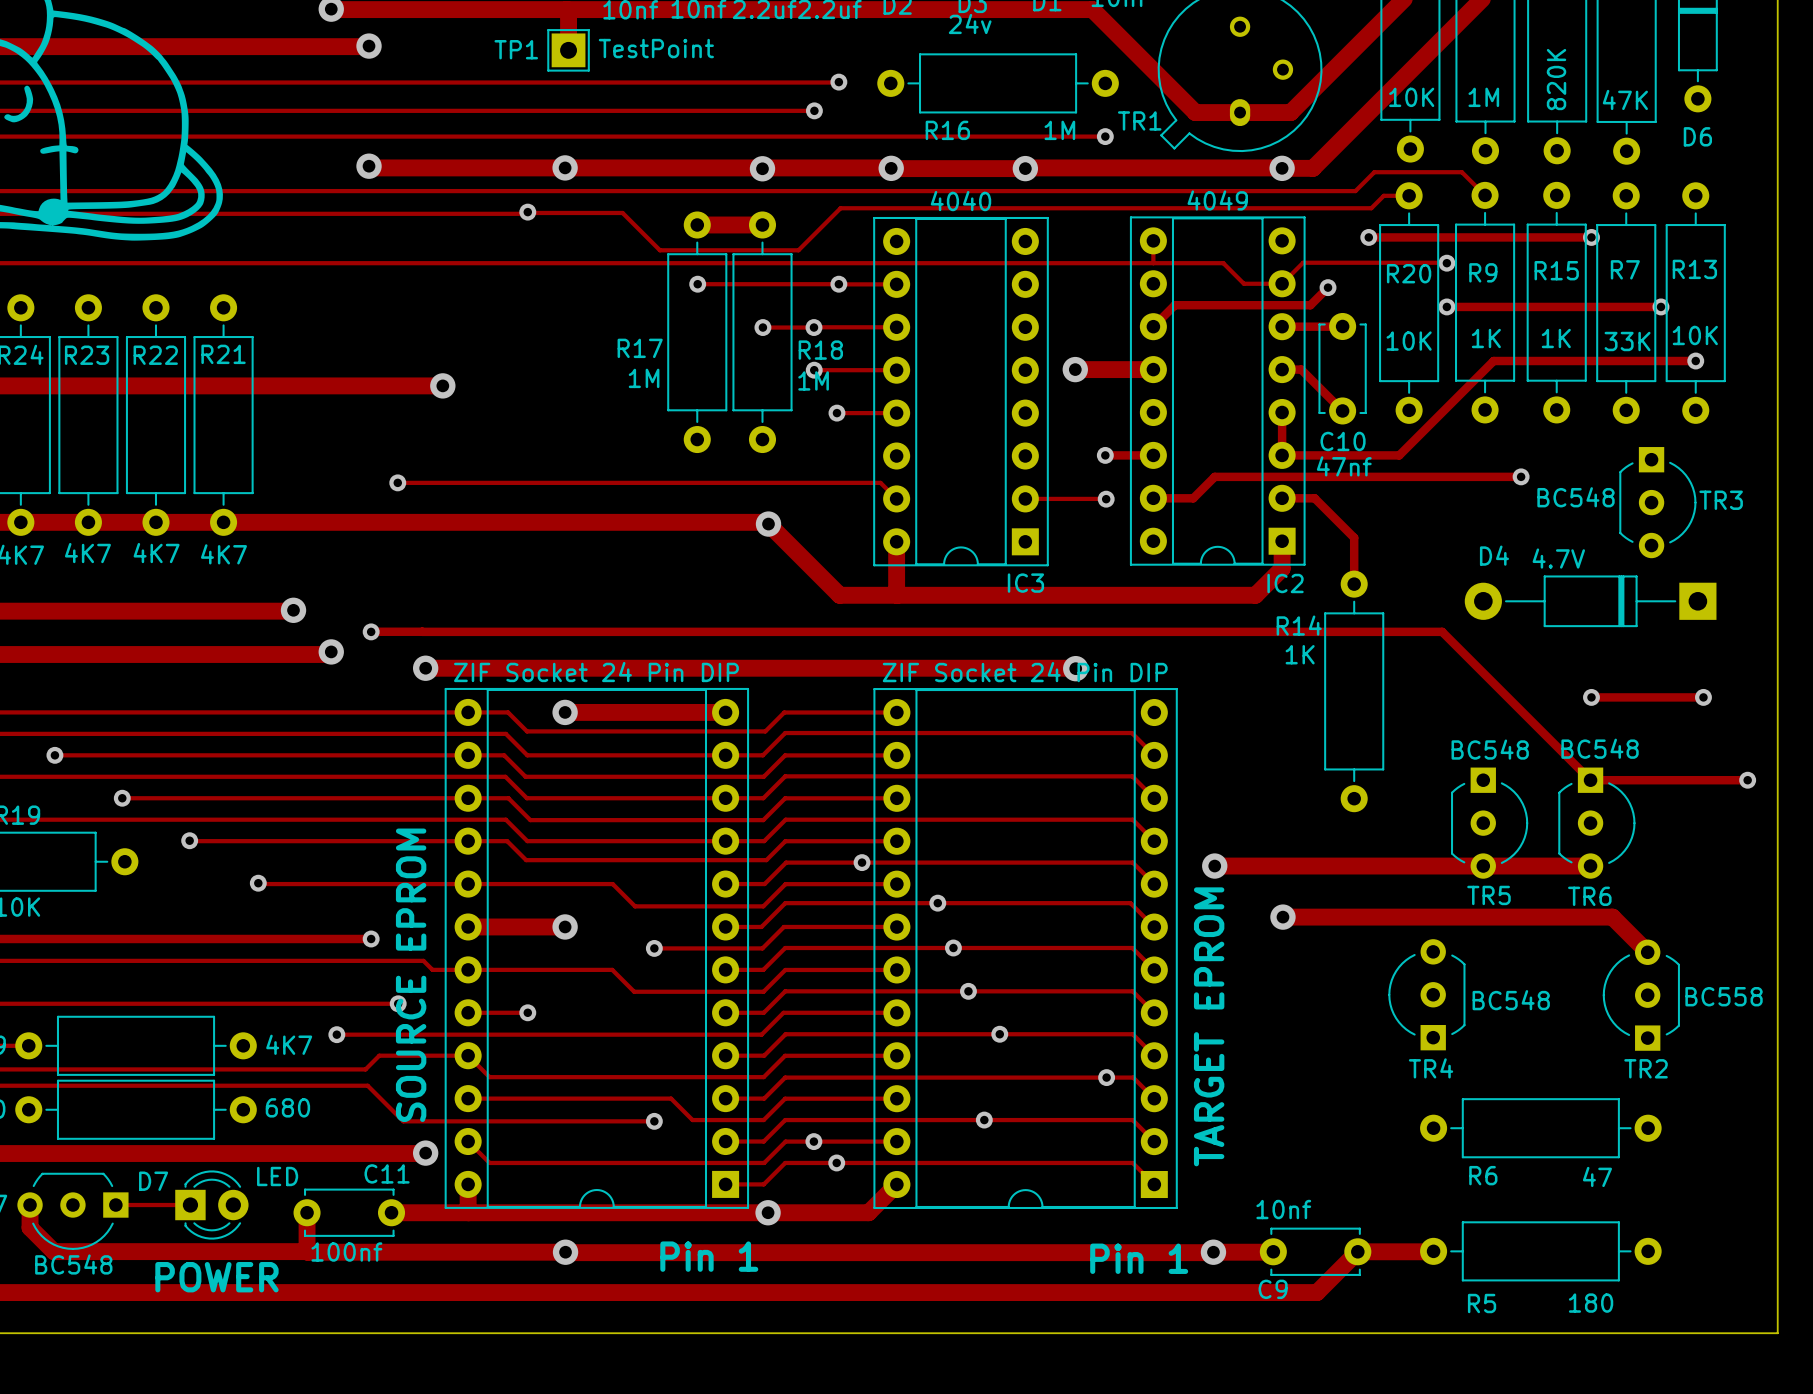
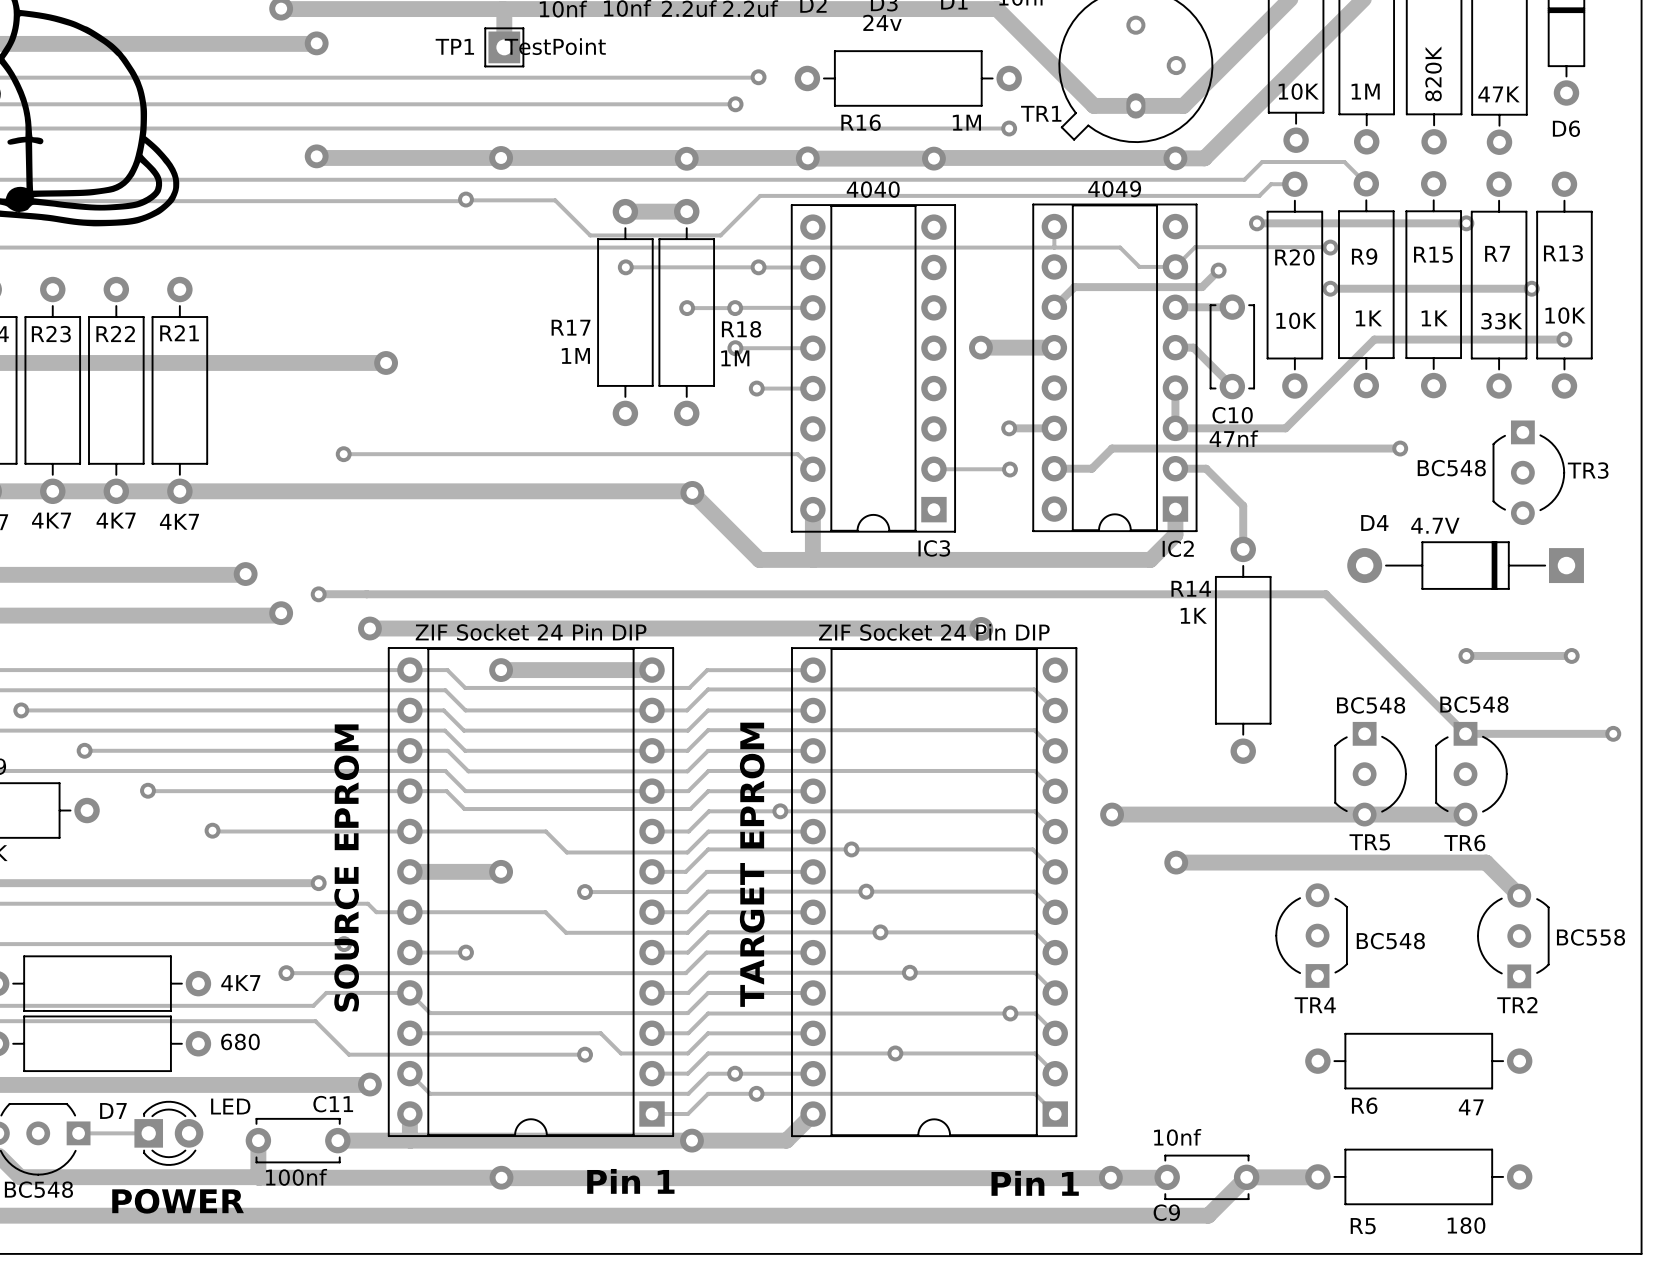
TP1 value position: TestPoint (656, 48) -> TestPoint (555, 46)
text position: SOURCE EPROM (411, 975) -> SOURCE EPROM (346, 867)
text position: TARGET EPROM (1209, 1026) -> TARGET EPROM (752, 864)

